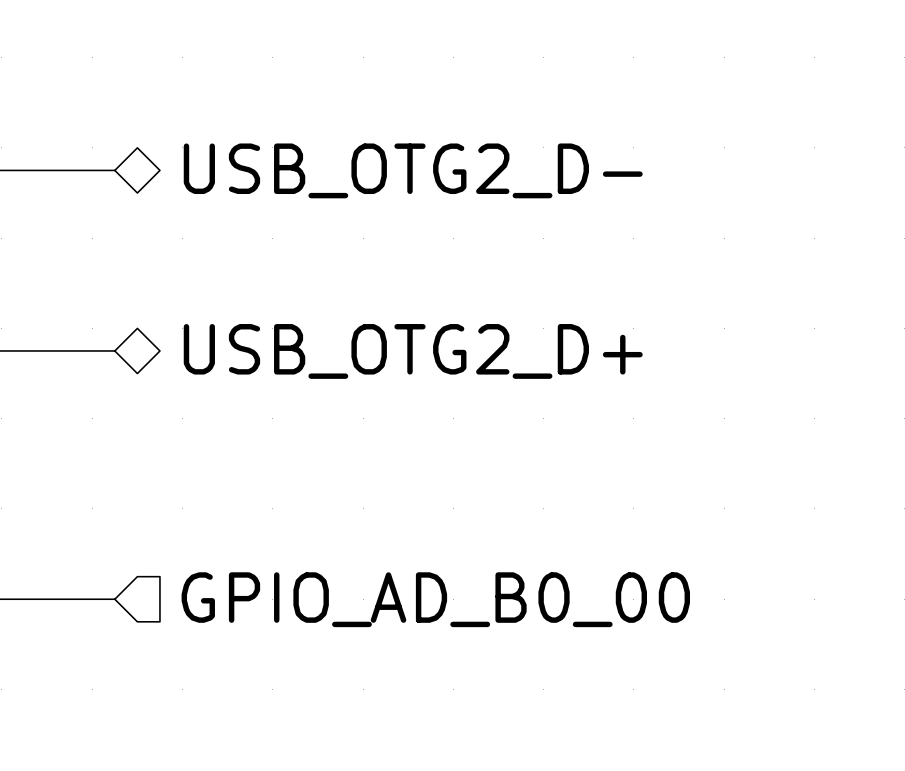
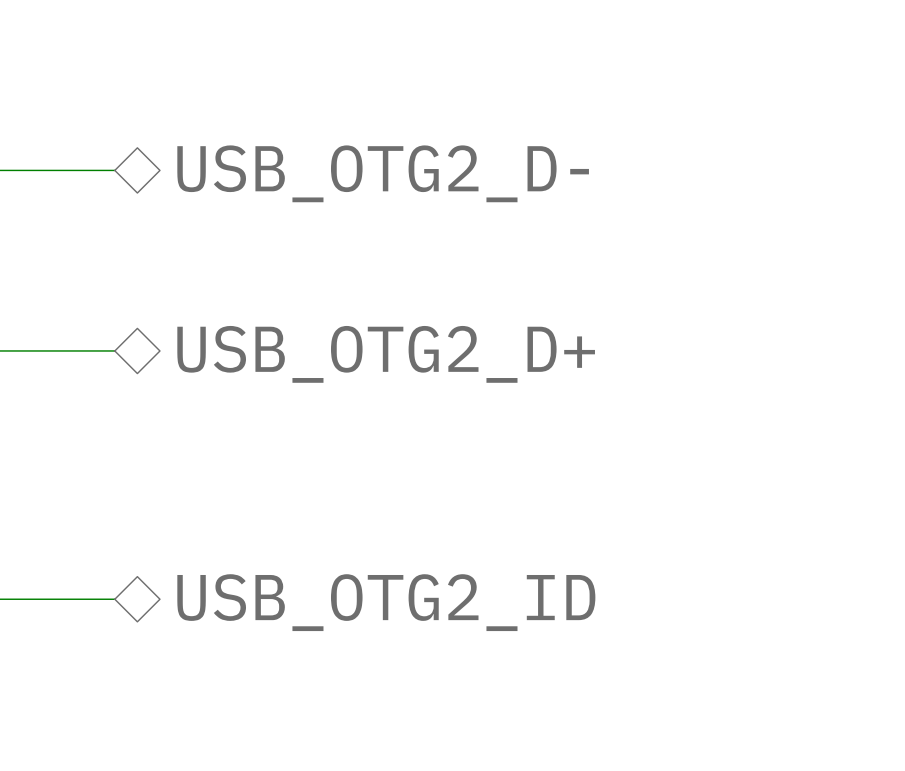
hierarchical label shape: input (435, 599) -> bidirectional (386, 602)
hierarchical label: GPIO_AD_B0_00 (435, 599) -> USB_OTG2_ID (386, 602)

